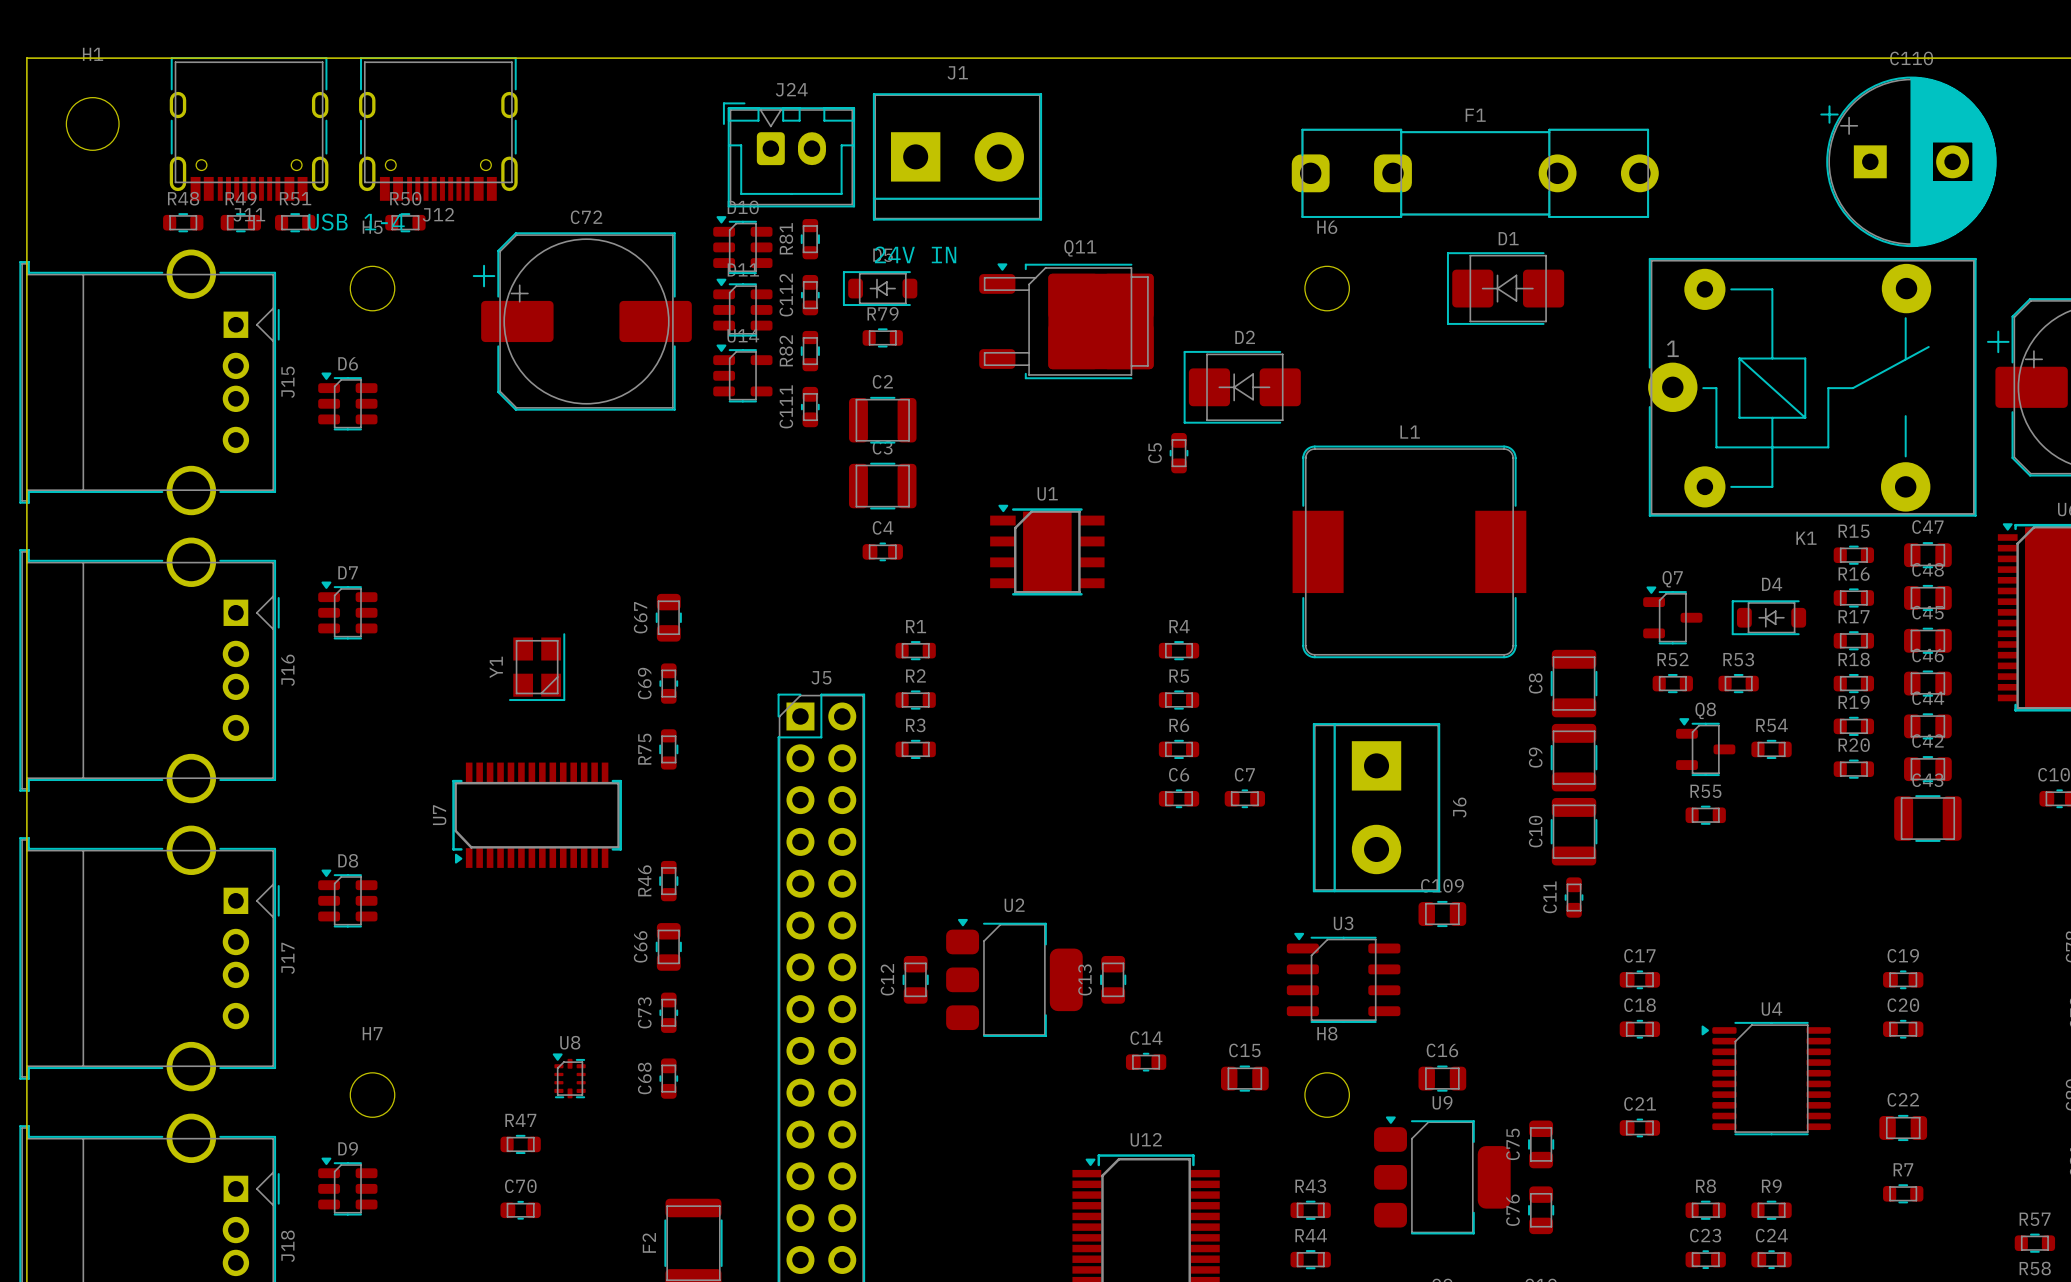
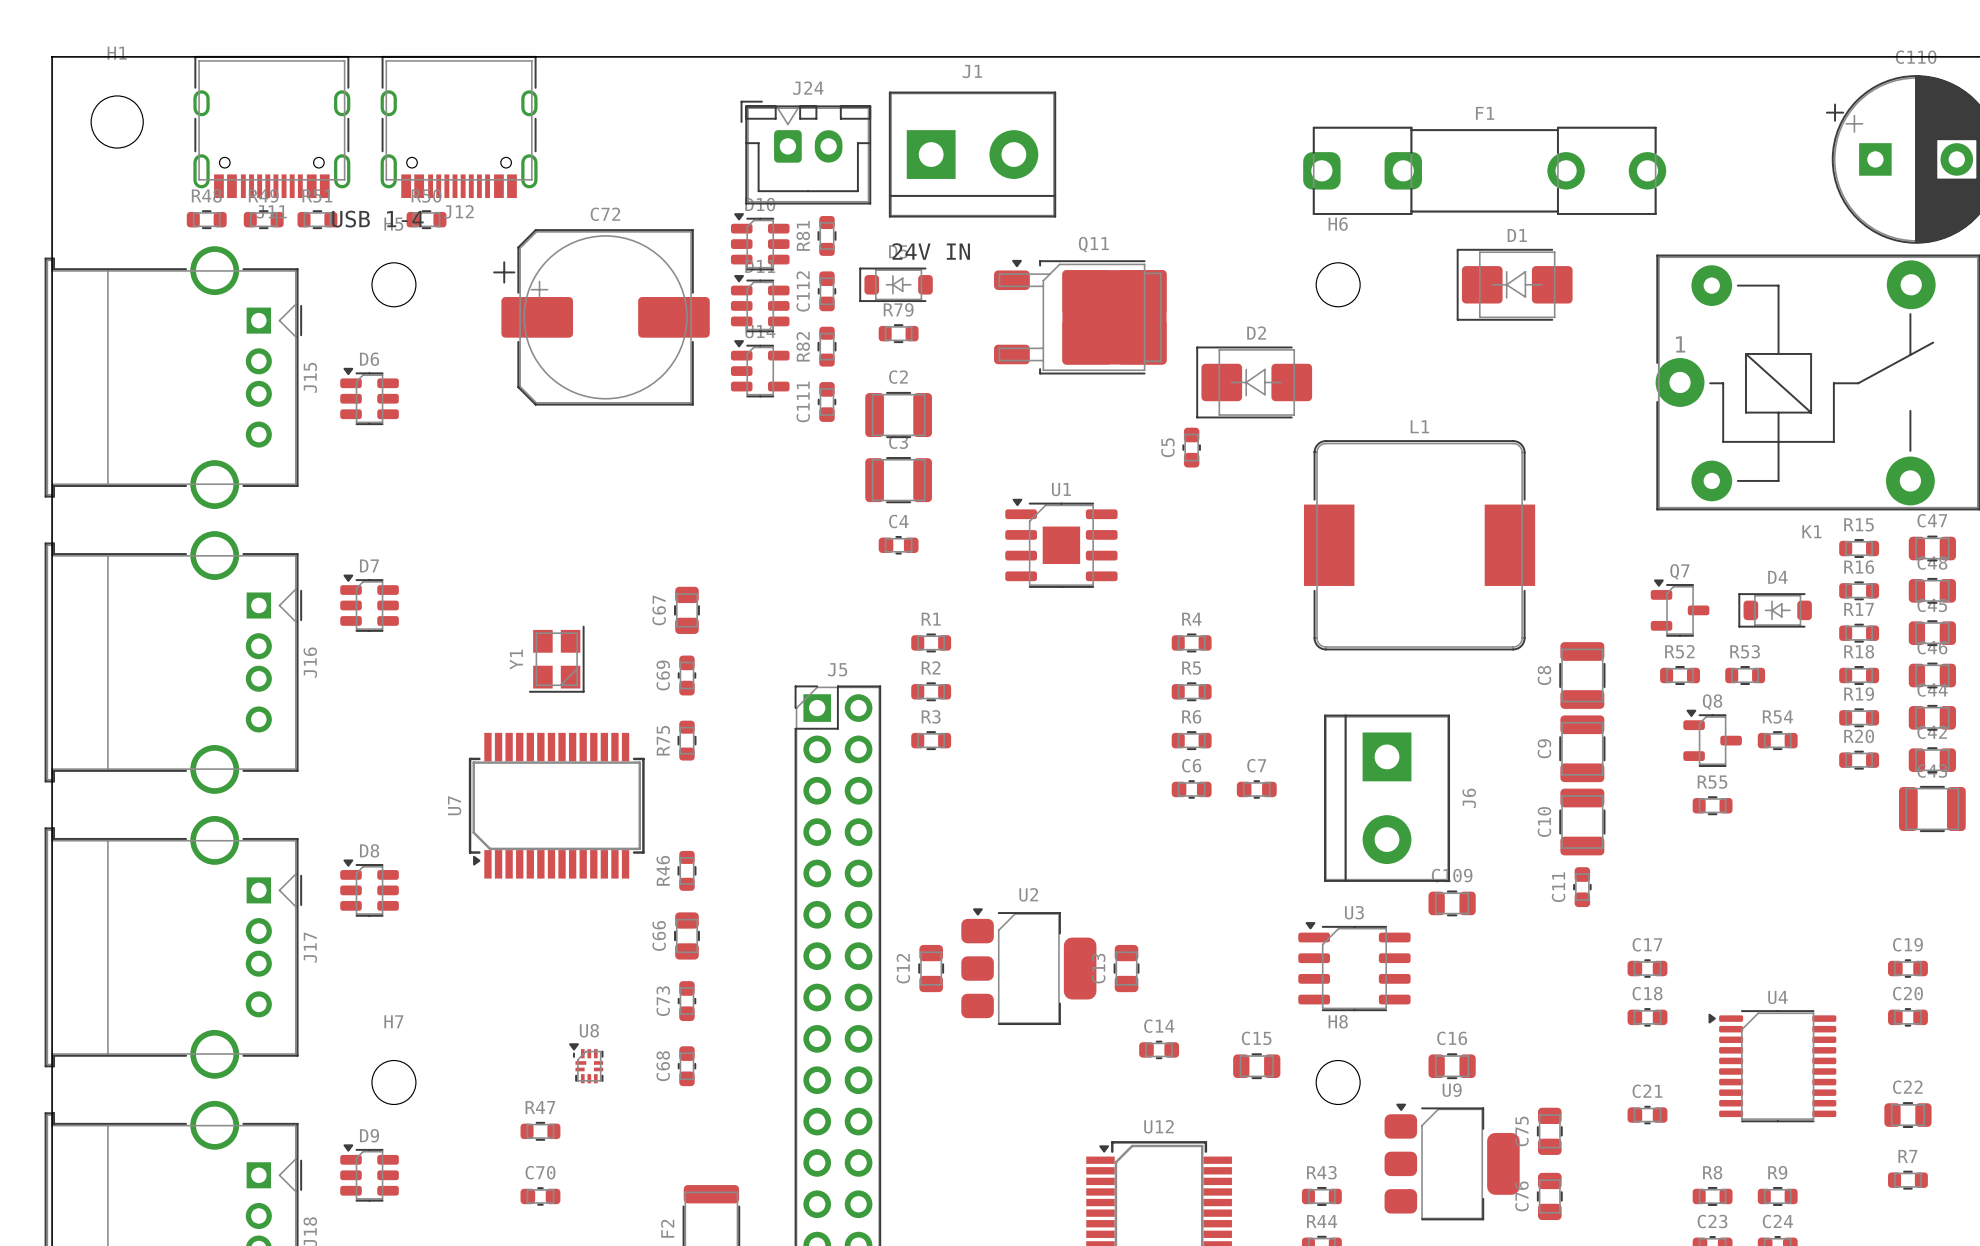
U1 footprint: [990, 504, 1105, 596] -> [1005, 498, 1118, 588]
U7 footprint: [452, 762, 622, 868] -> [468, 732, 645, 879]
U8 footprint: [552, 1053, 586, 1099] -> [569, 1043, 604, 1084]

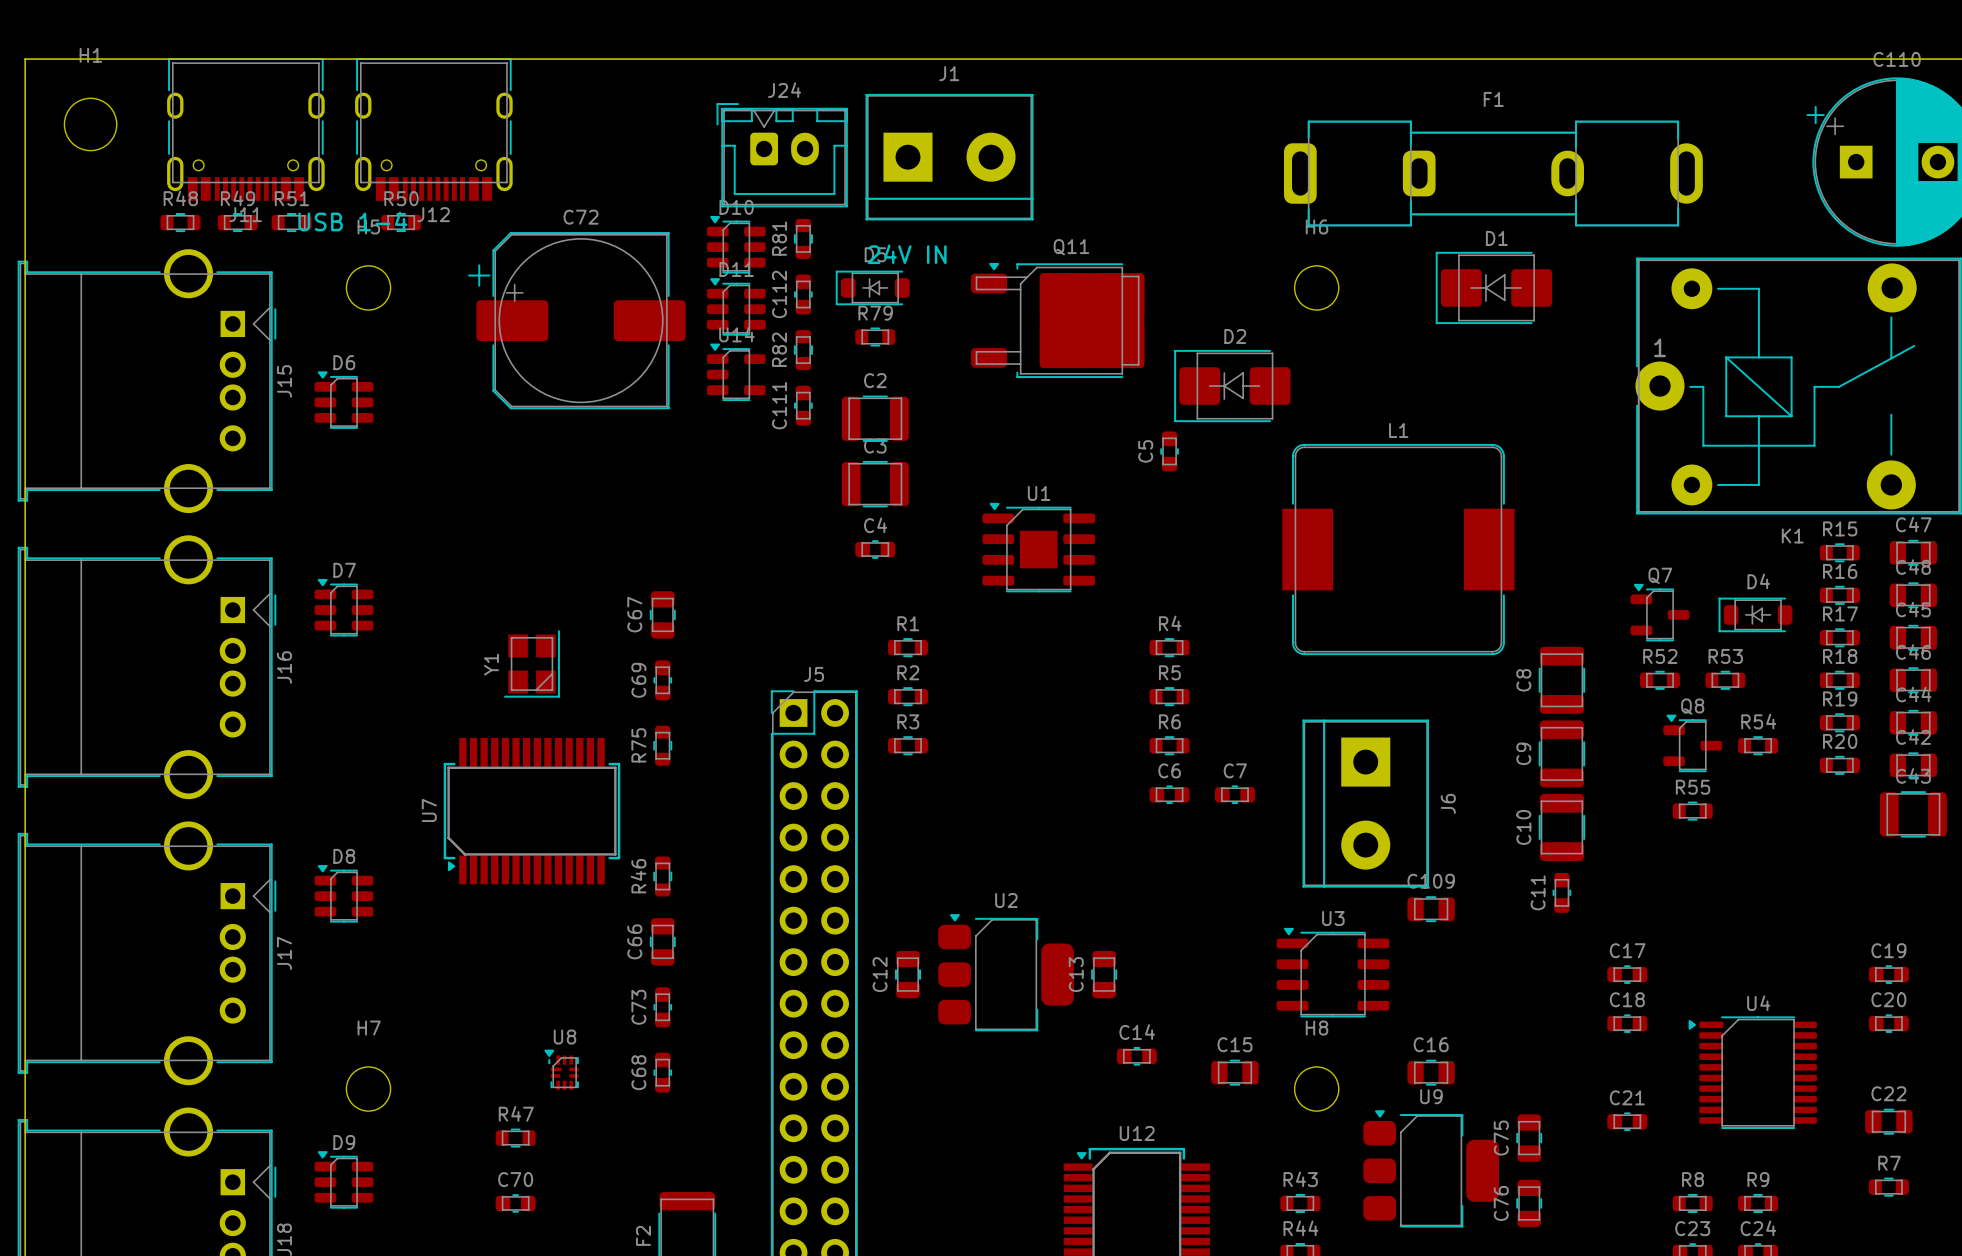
F1 footprint: [1303, 126, 1667, 215] -> [1284, 120, 1703, 227]

